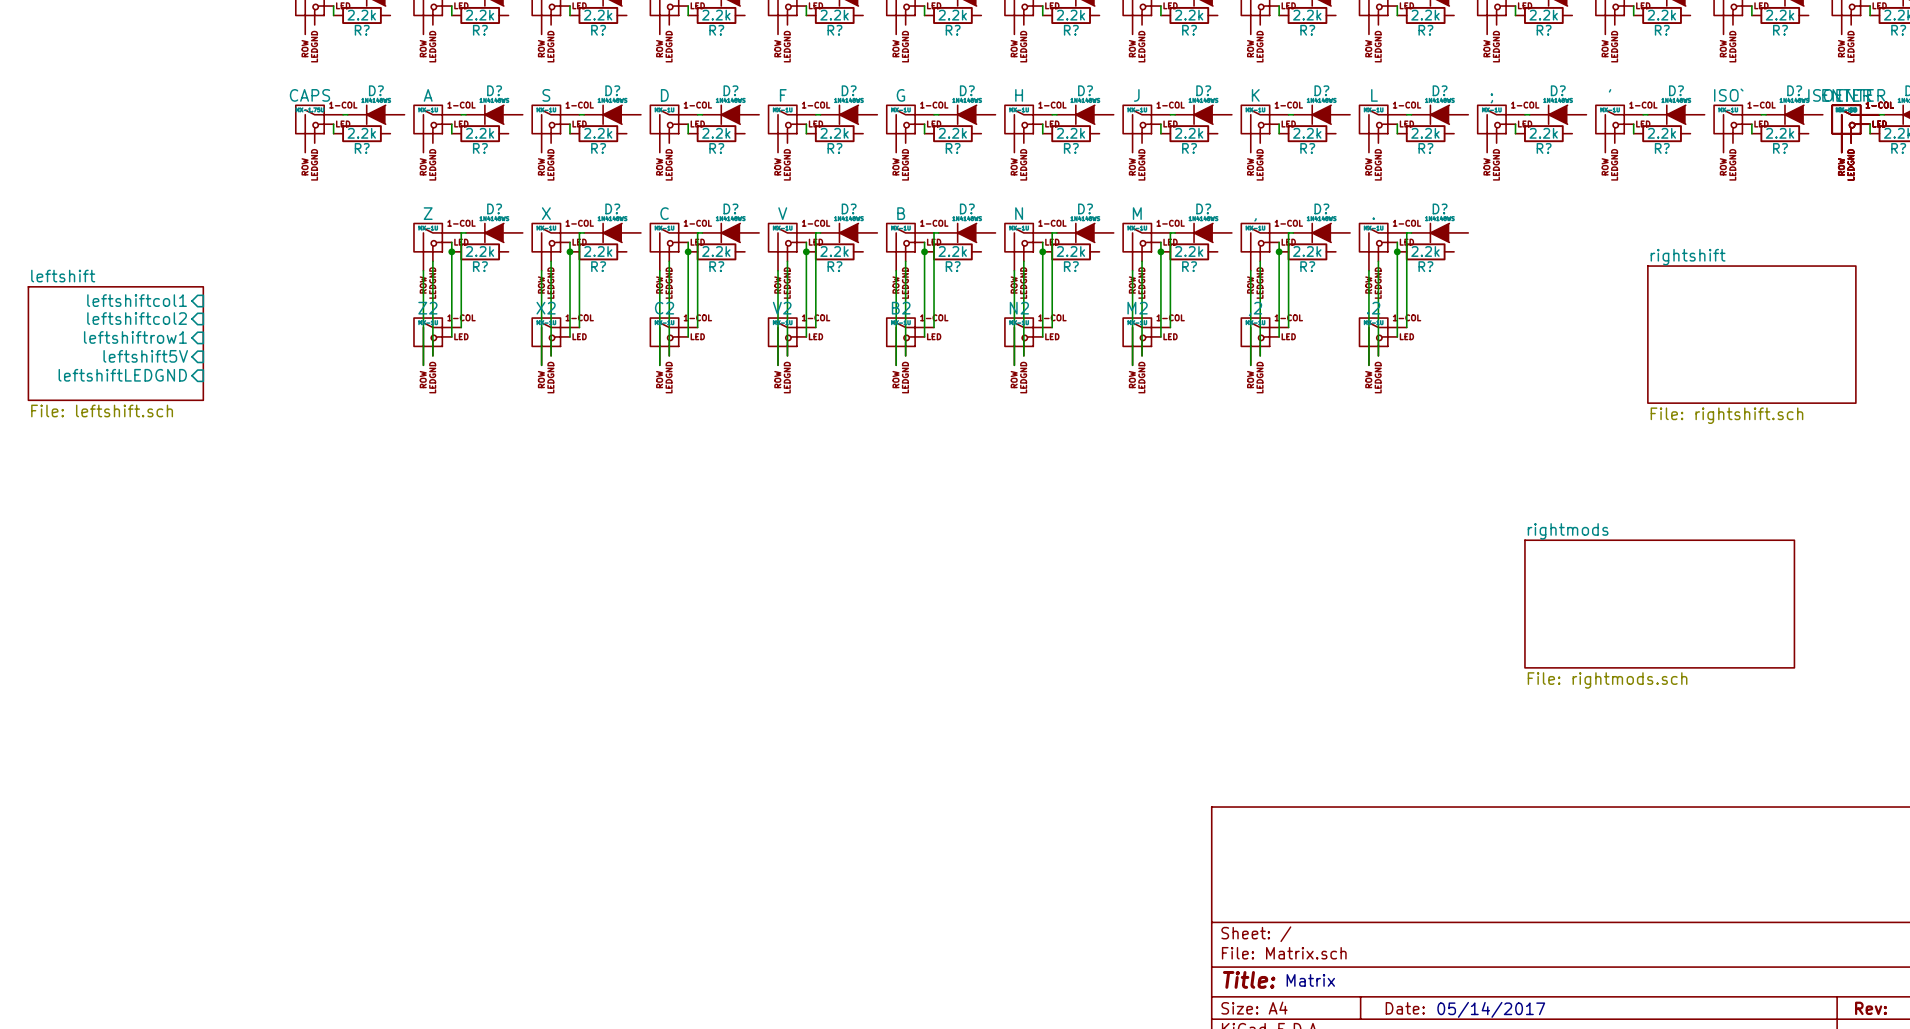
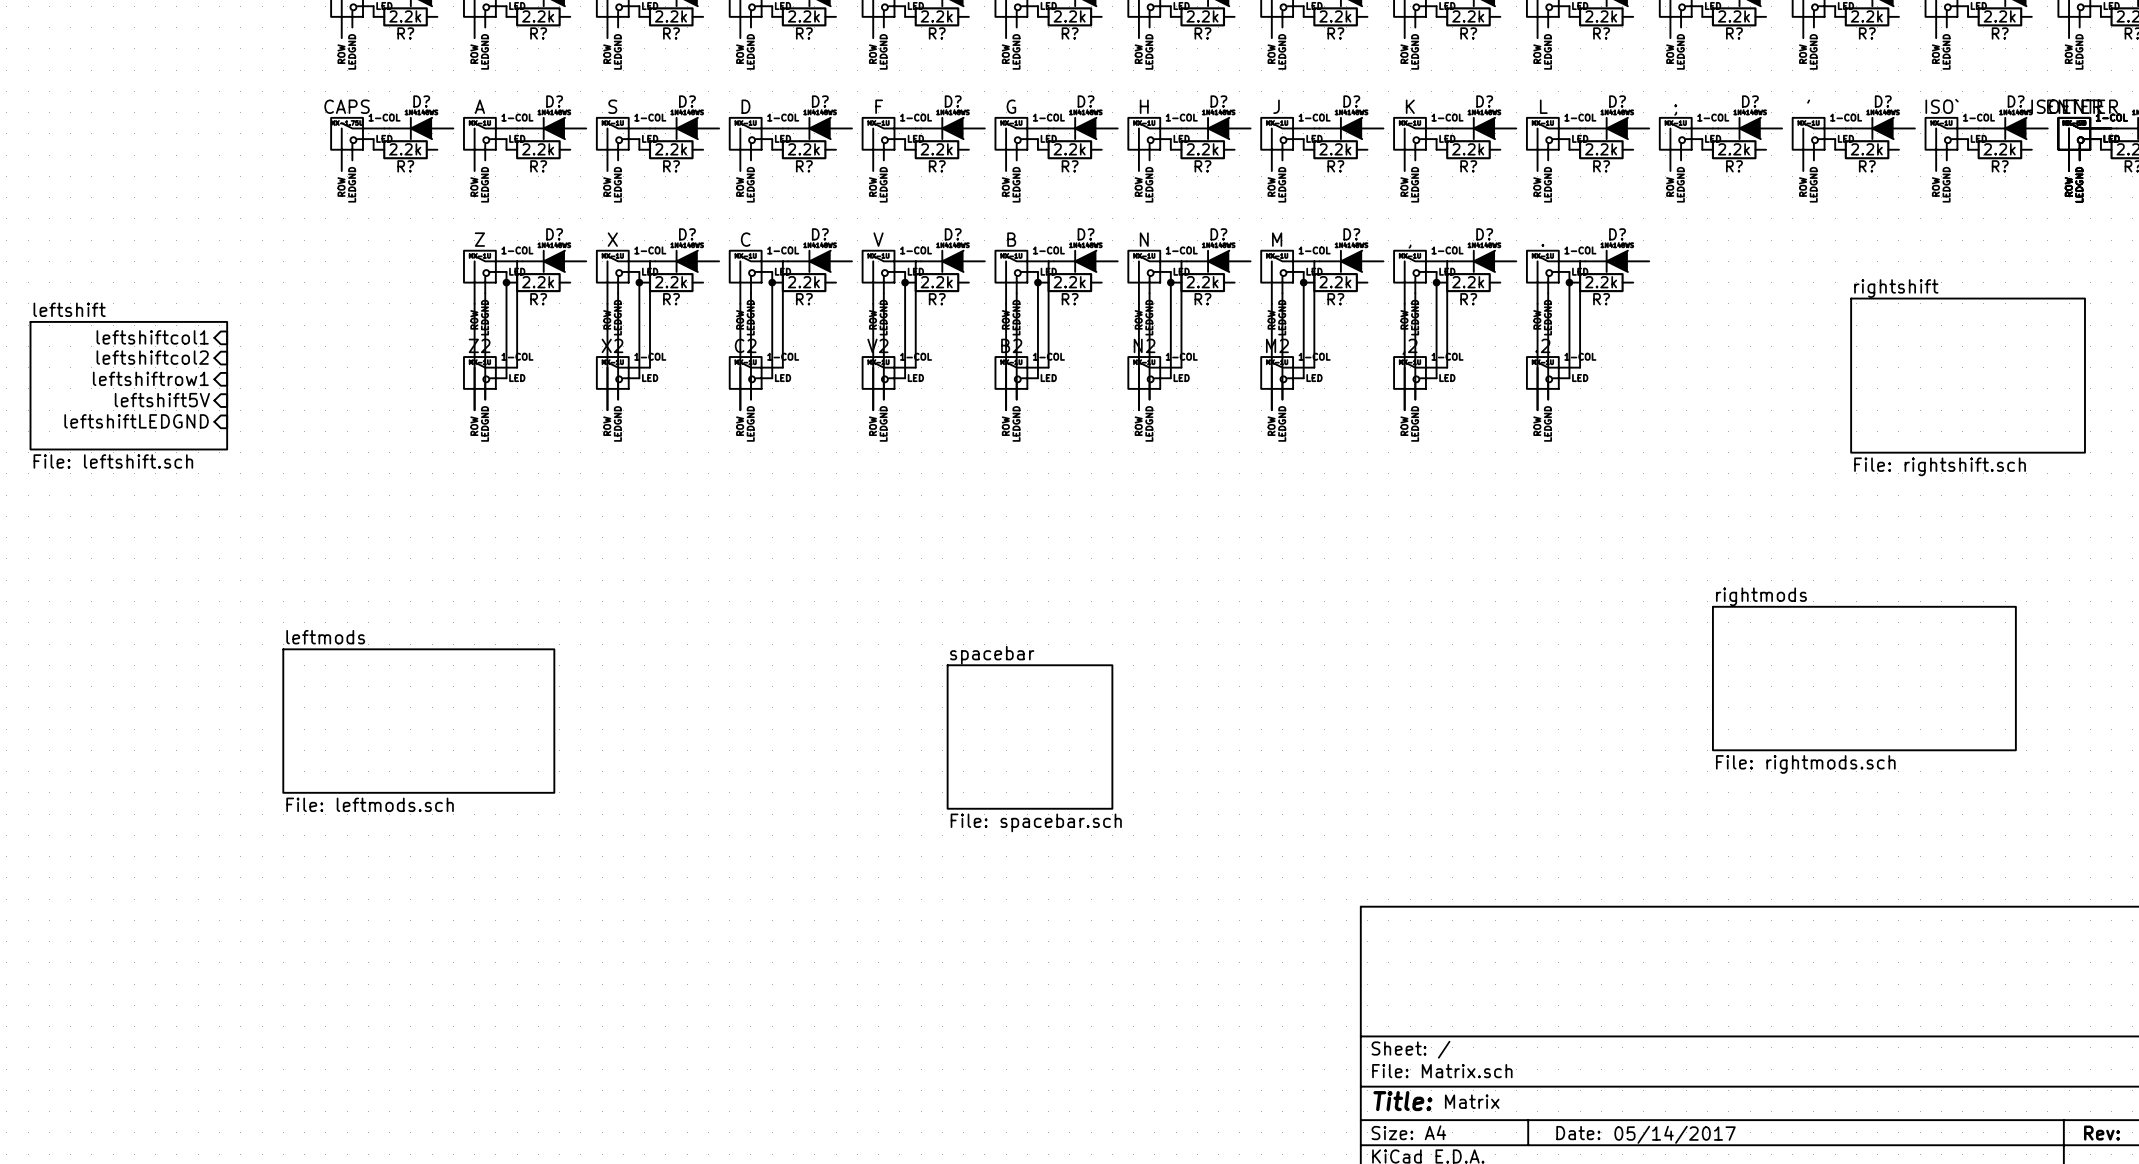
sheet leftmods: none -> File: leftmods.sch (418, 721)
sheet spacebar: none -> File: spacebar.sch (1030, 737)

